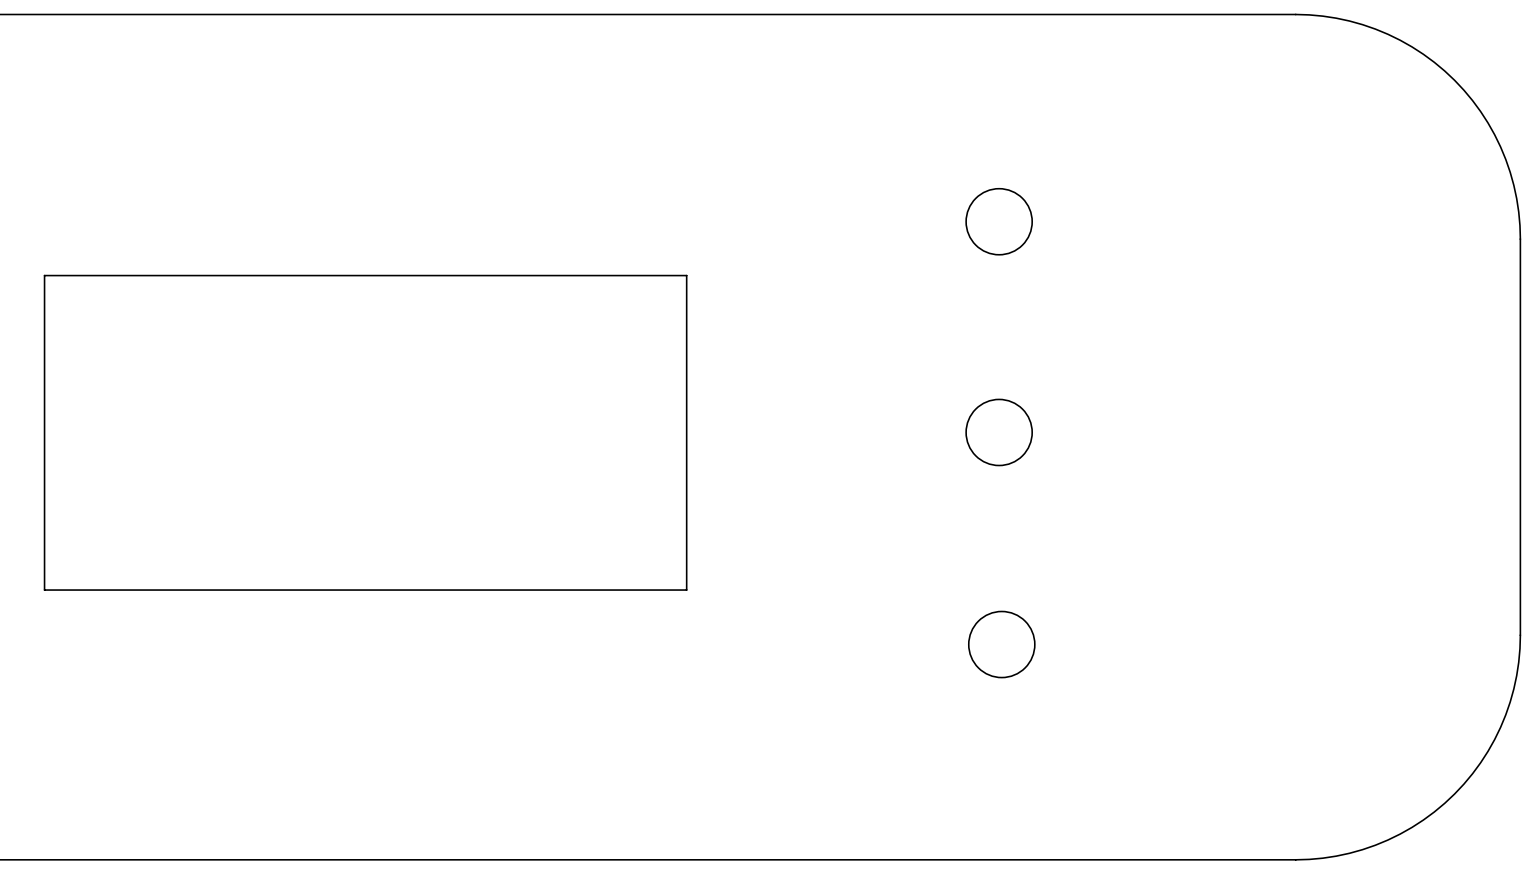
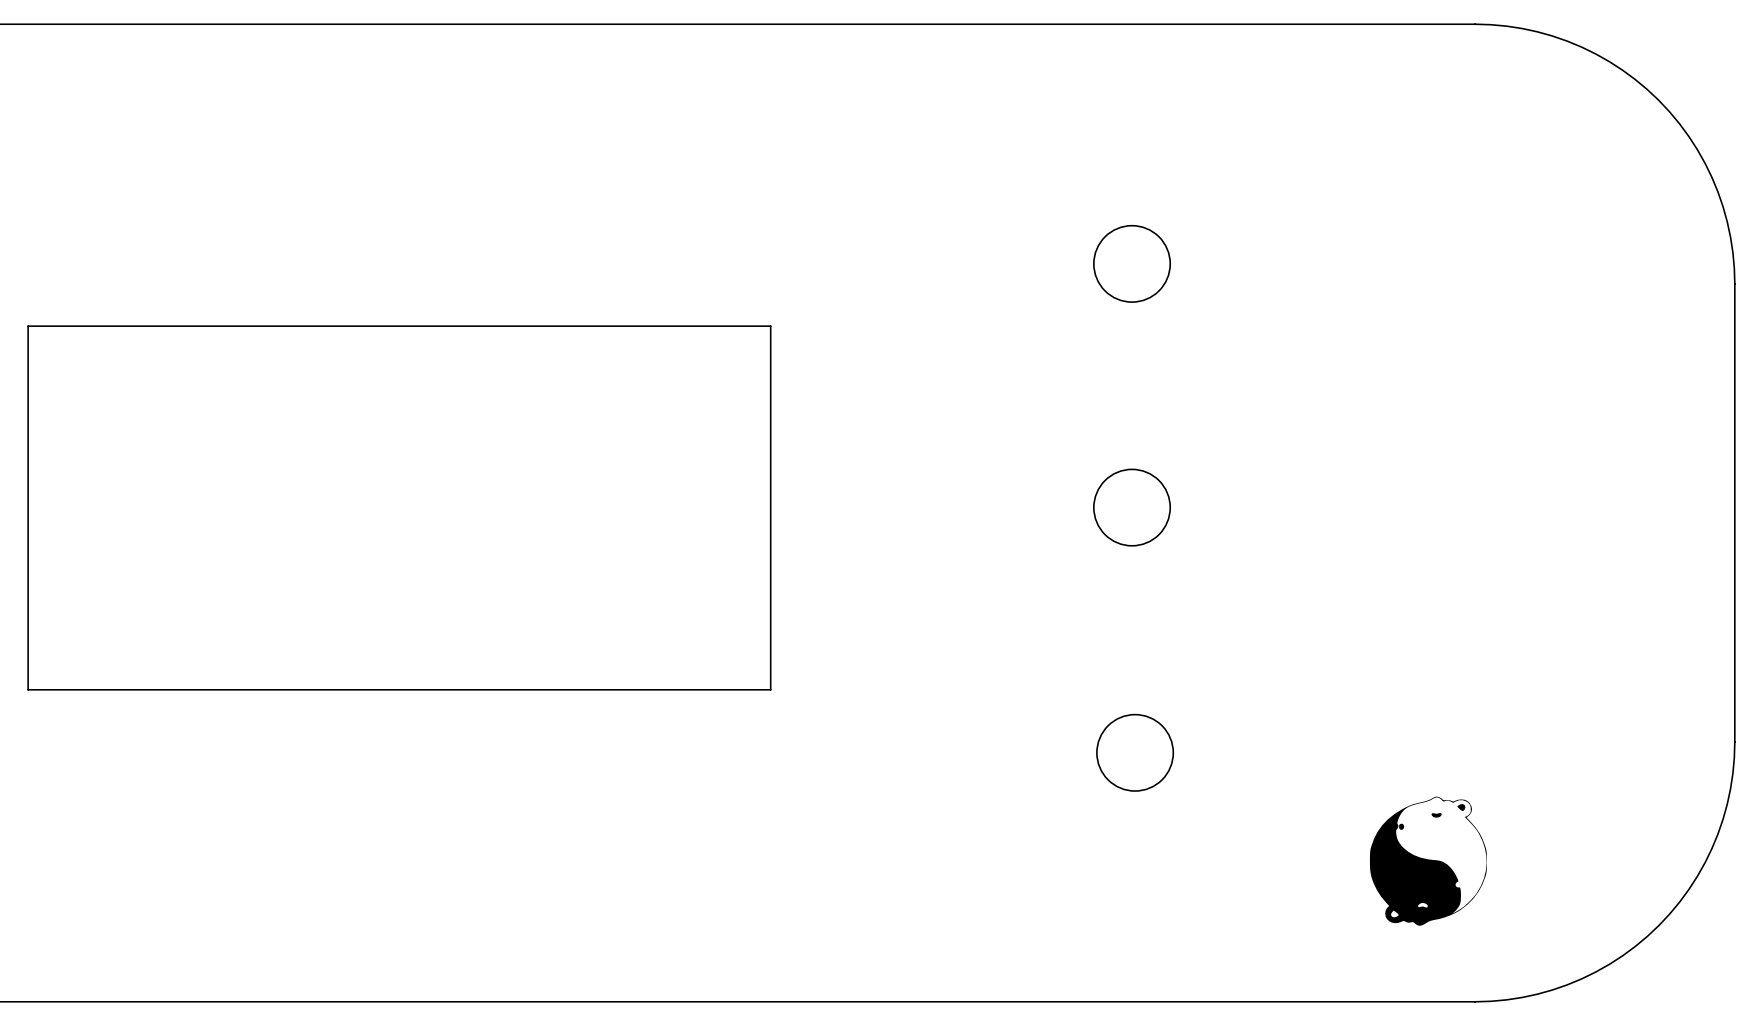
drawing: none -> [1369, 796, 1487, 926]

